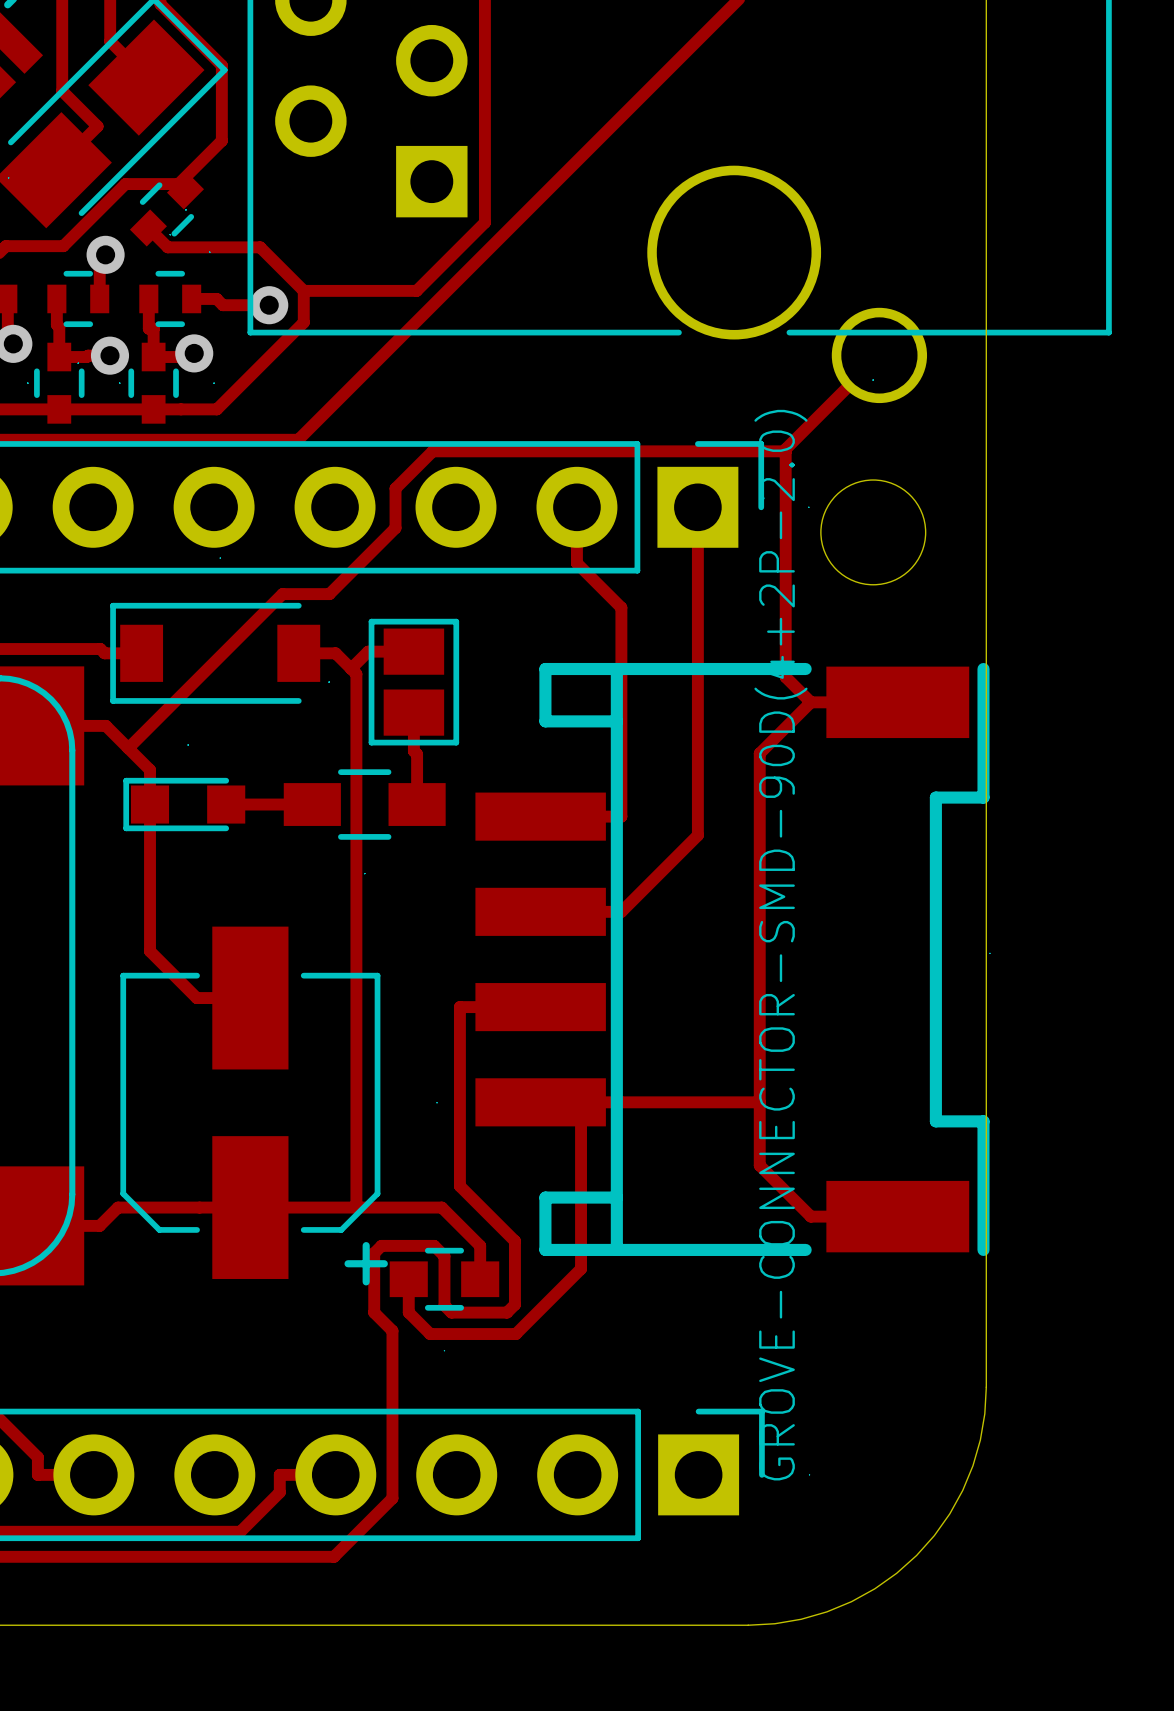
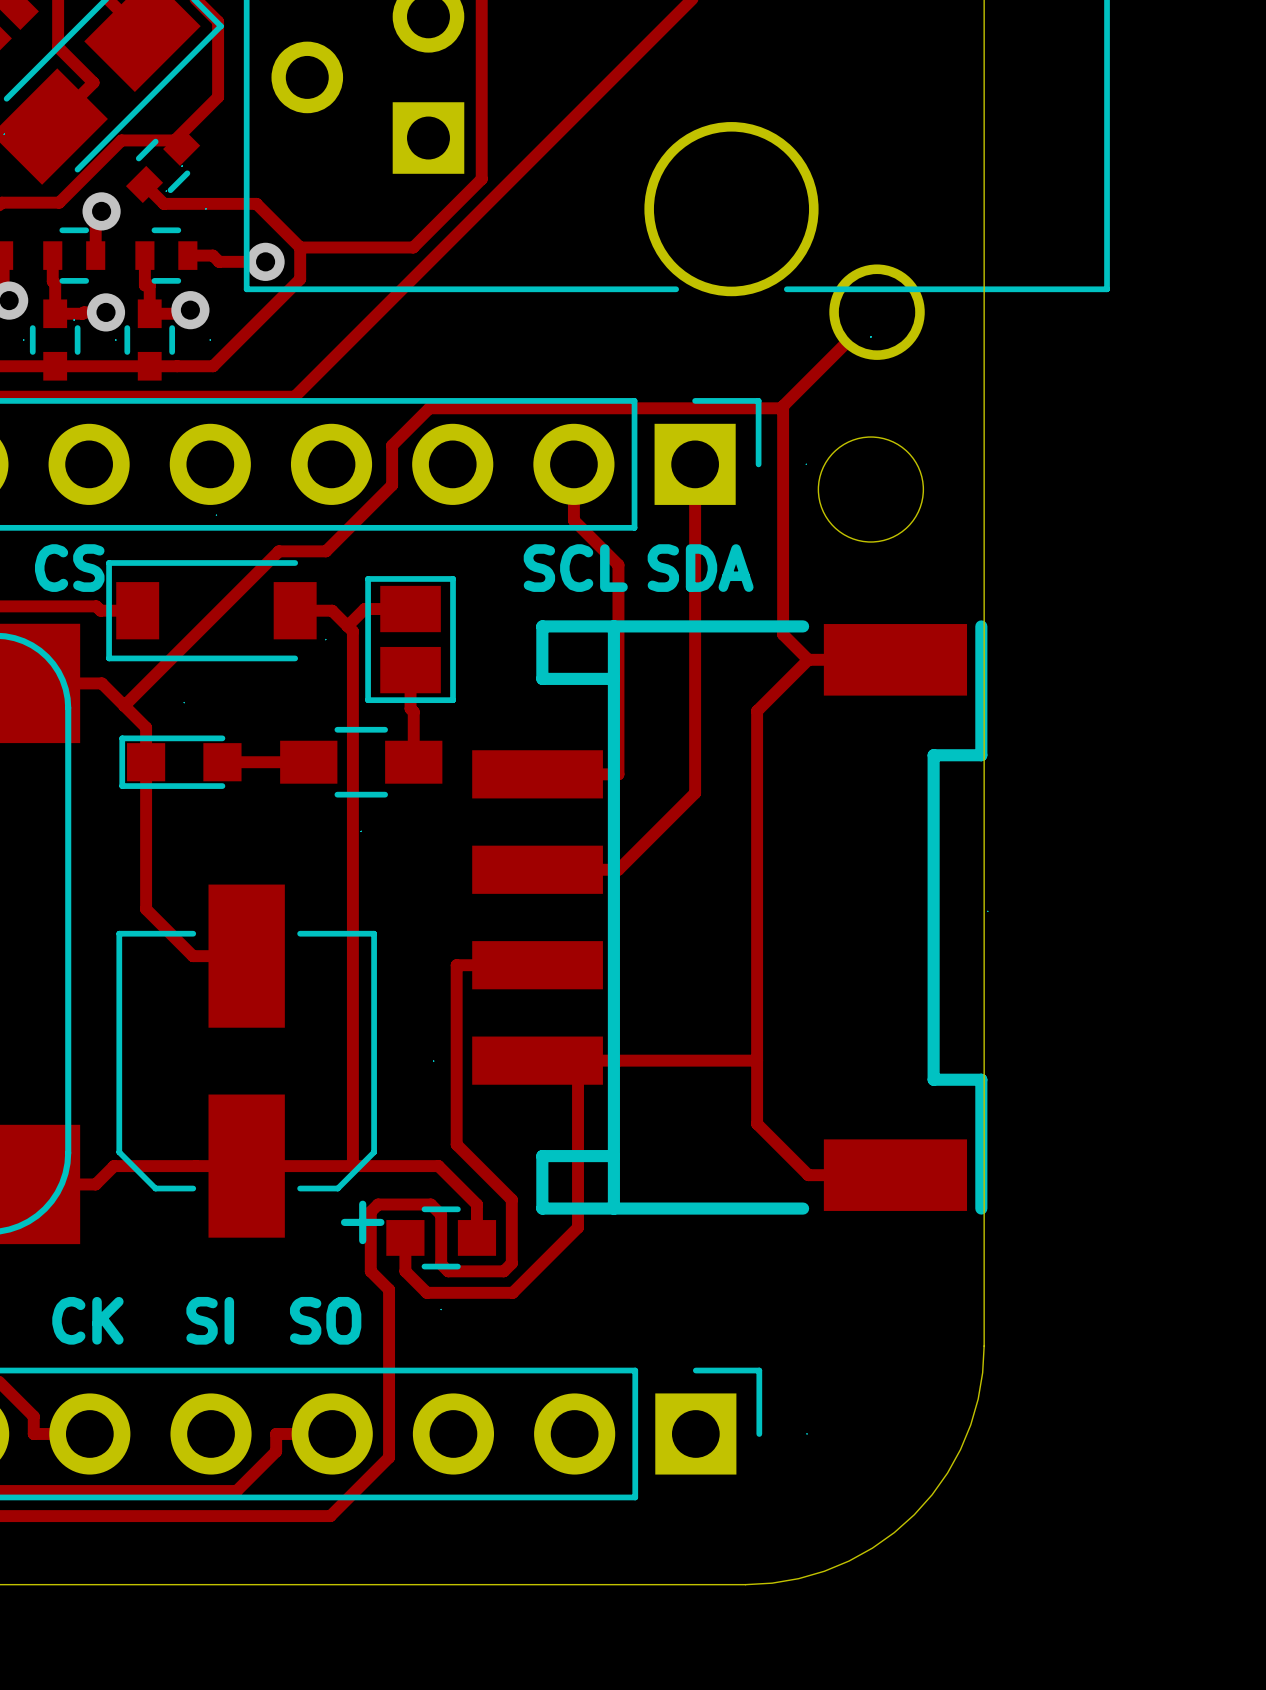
text: none -> CS (69, 568)
text: none -> SCL (575, 568)
text: none -> SDA (700, 568)
part value: GROVE-CONNECTOR-SMD-90D(4+2P-2.0) (780, 945) -> none
text: none -> CK (87, 1320)
text: none -> SI (210, 1320)
text: none -> SO (325, 1320)

